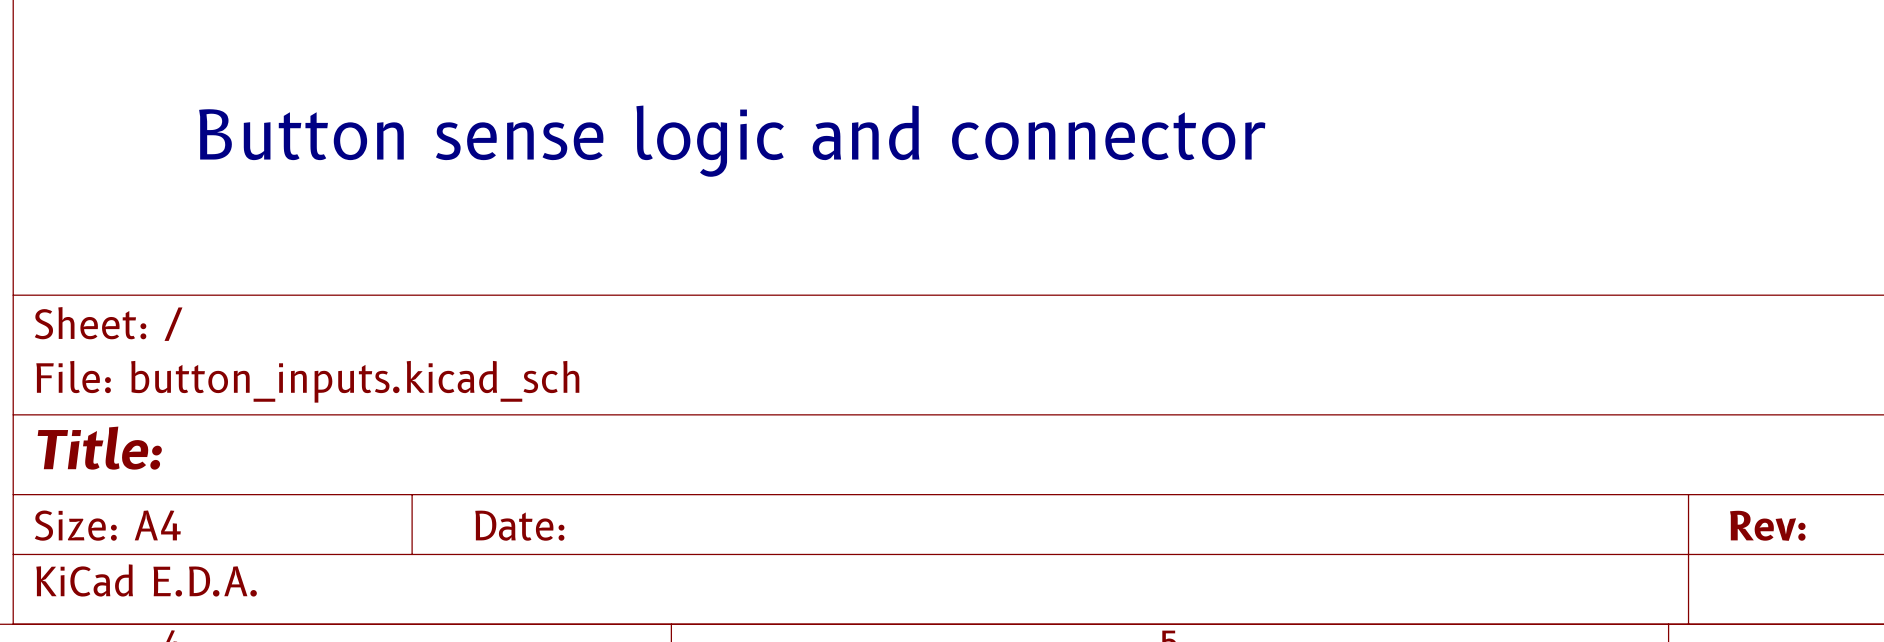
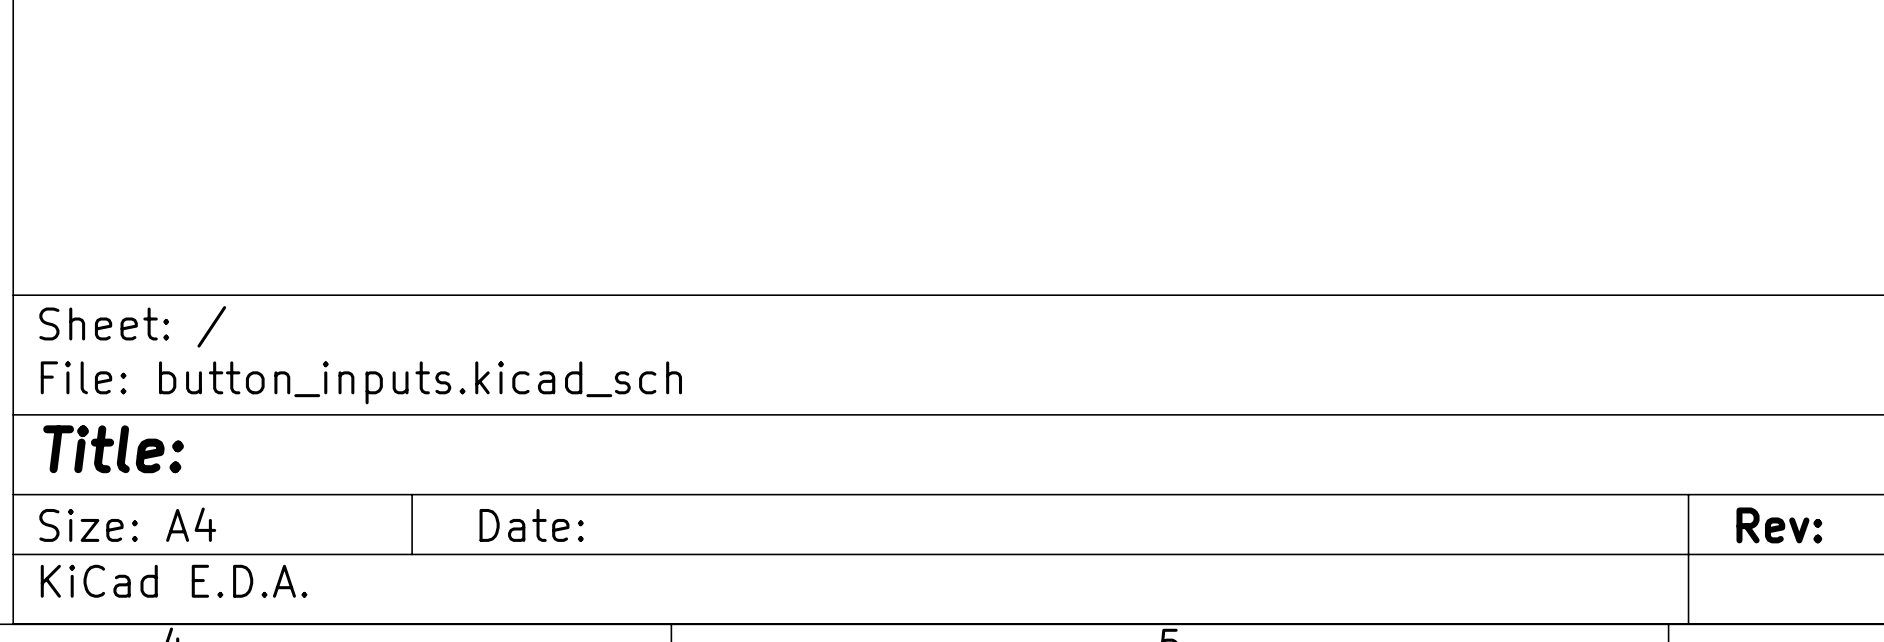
text: Button sense logic and connector (732, 141) -> none

